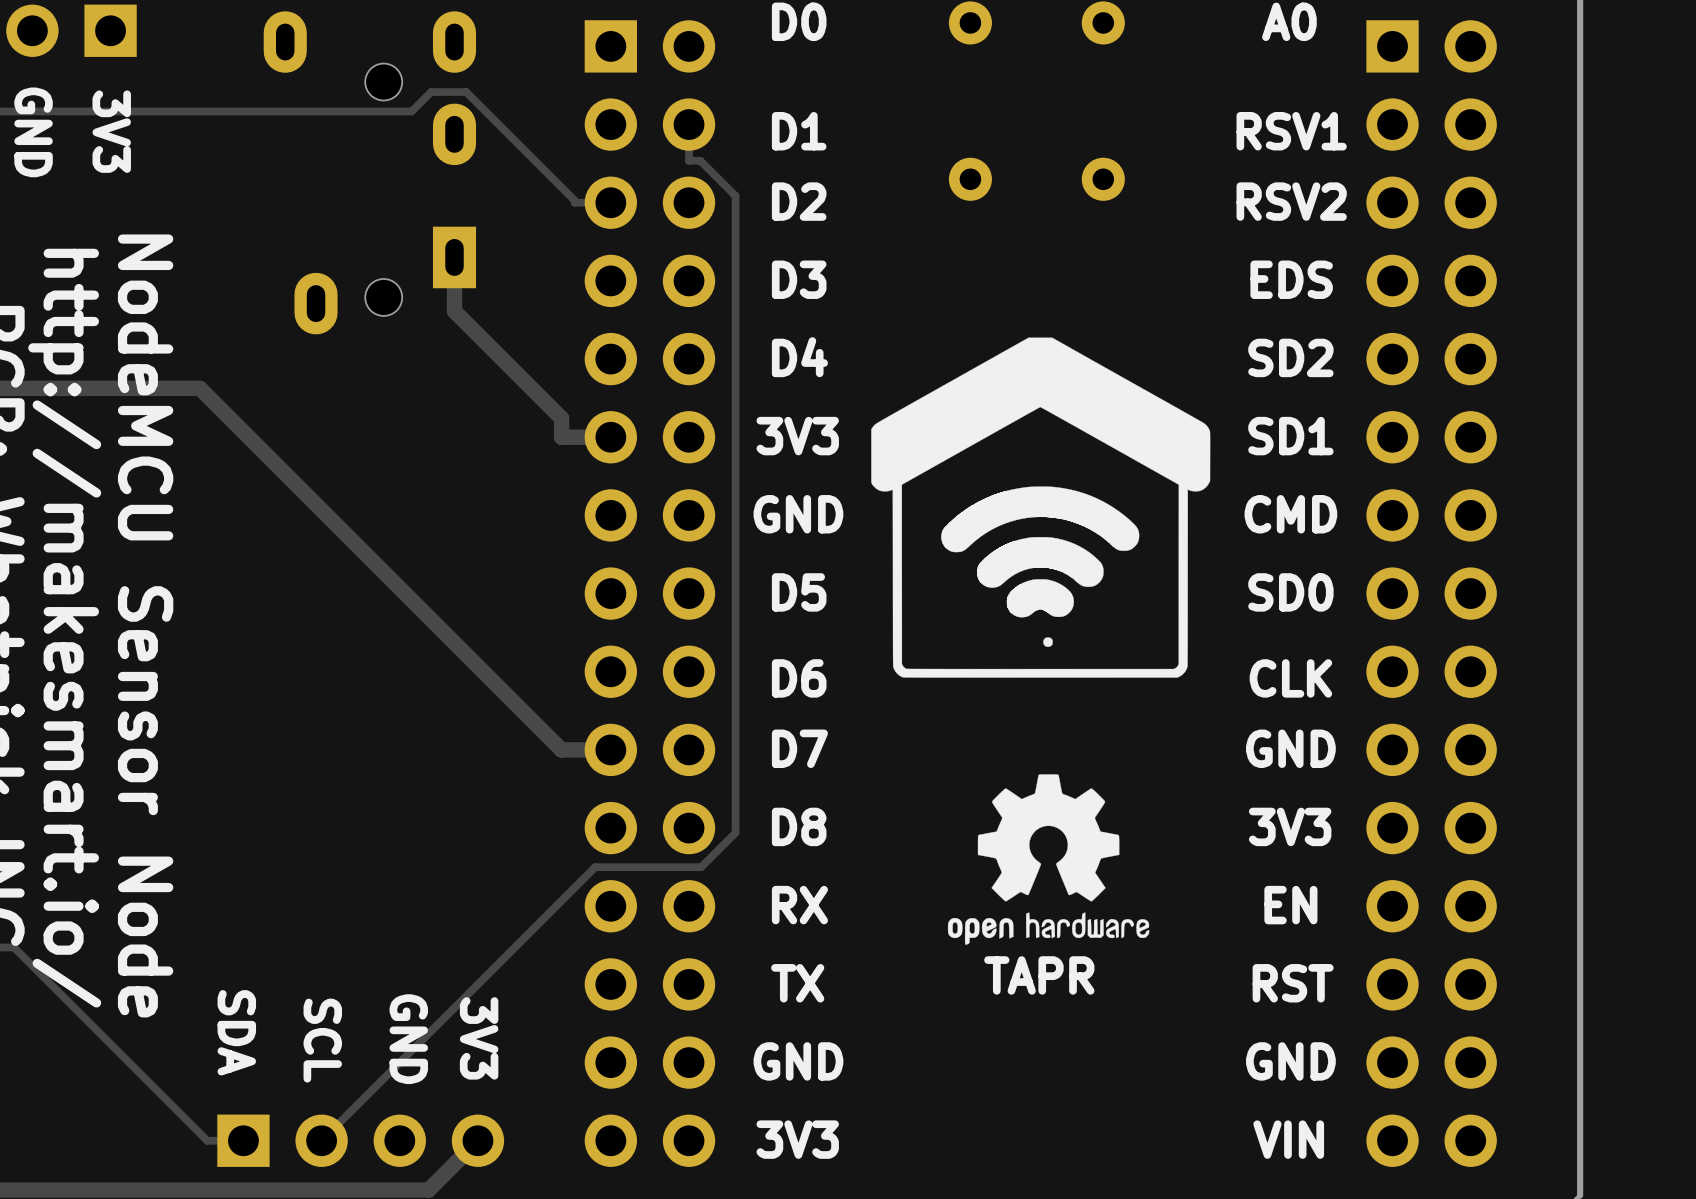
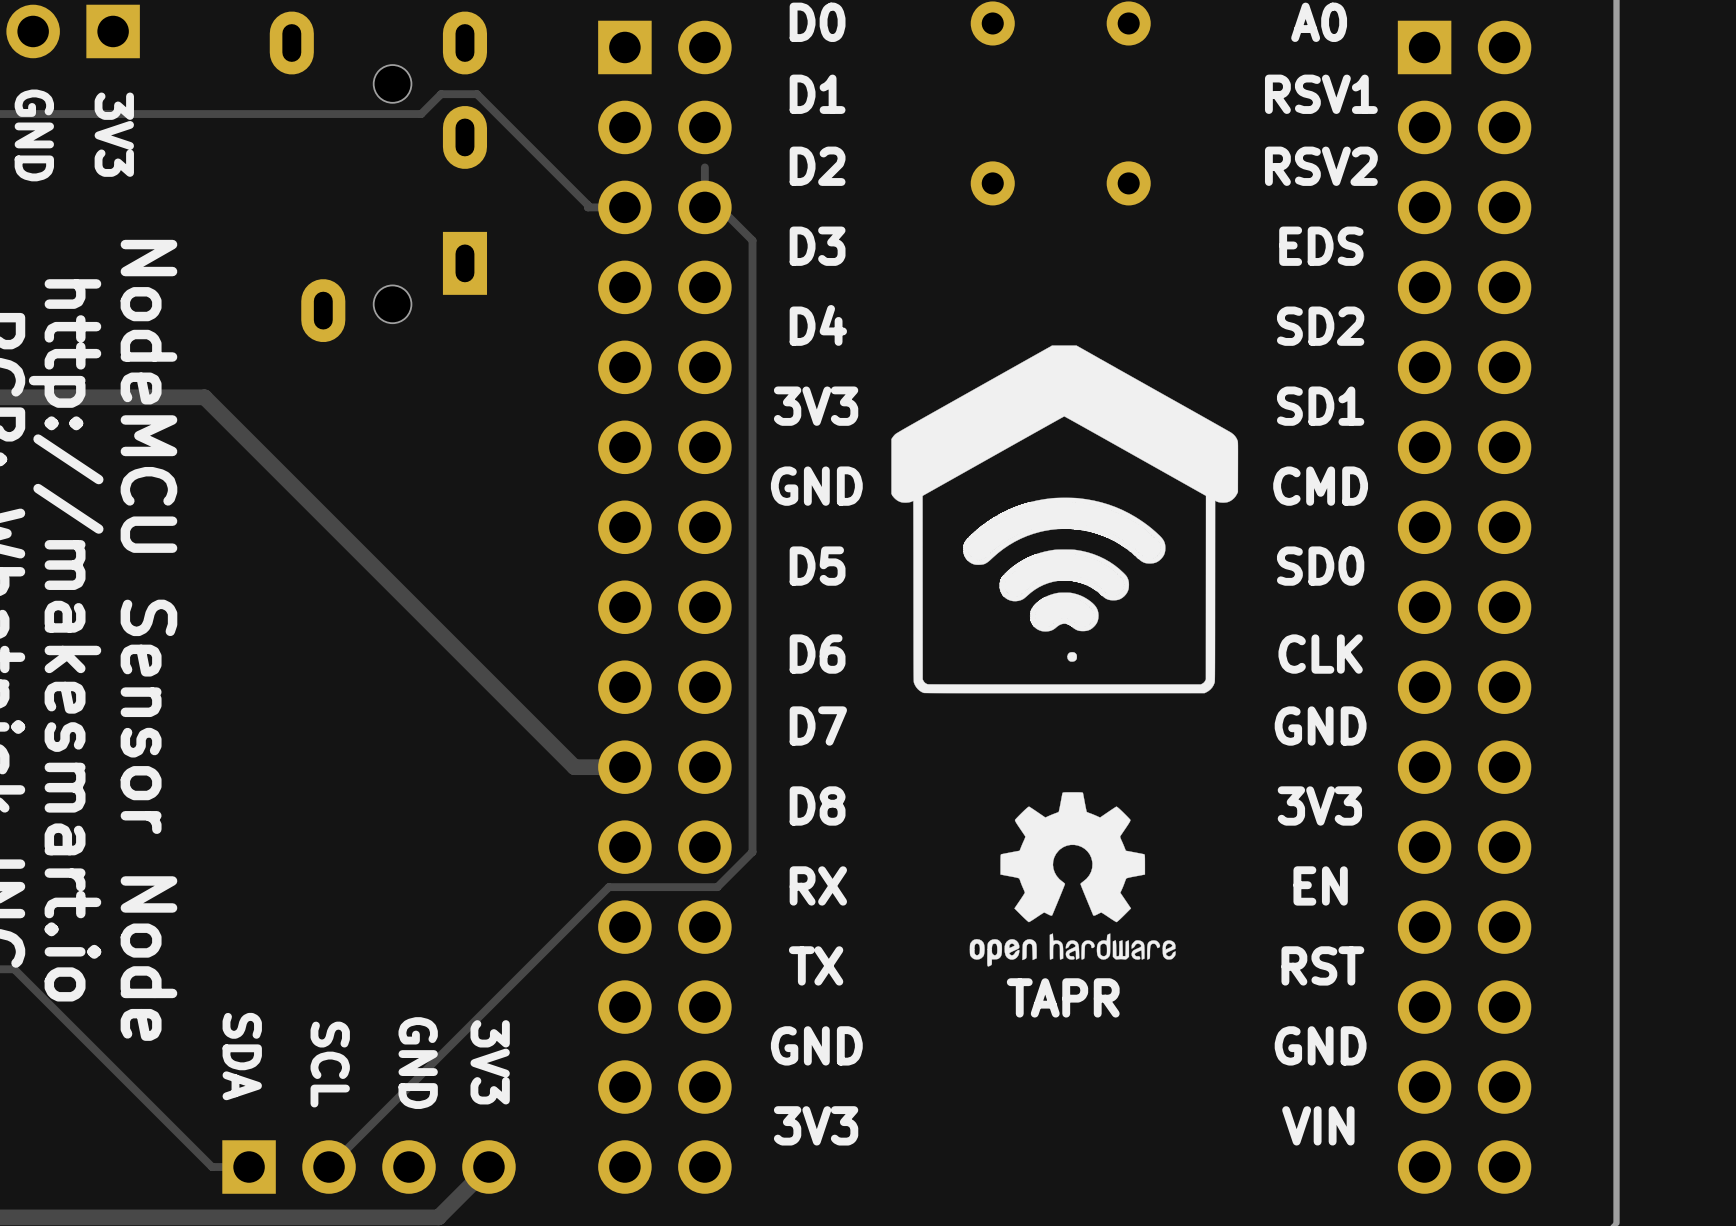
track: (689, 124) (689, 160) (700, 160) (735, 196) (735, 235) -> (704, 167) (704, 204) (716, 204) (752, 240)
text position: D1 (799, 131) -> D1 (817, 94)
text position: RSV1 (1291, 131) -> RSV1 (1321, 94)
text position: D2 (799, 201) -> D2 (817, 166)
text position: RSV2 (1291, 201) -> RSV2 (1321, 166)
track: (454, 257) (454, 311) (561, 418) (561, 437) (610, 437) -> none
text position: D3 (799, 279) -> D3 (817, 246)
text position: EDS (1291, 279) -> EDS (1321, 246)
text position: D4 (799, 357) -> D4 (818, 325)
text position: SD2 (1290, 357) -> SD2 (1320, 326)
text position: 3V3 (797, 436) -> 3V3 (816, 406)
text position: SD1 (1290, 436) -> SD1 (1320, 406)
text position: GND (798, 514) -> GND (816, 486)
text position: CMD (1290, 514) -> CMD (1320, 486)
text position: D5 (799, 592) -> D5 (817, 566)
text position: SD0 (1290, 592) -> SD0 (1320, 566)
text: http://makesmart.io/ (64, 628) -> http://makesmart.io (66, 640)
text position: D6 (799, 678) -> D6 (817, 654)
text position: CLK (1290, 678) -> CLK (1320, 654)
text position: D7 (799, 748) -> D7 (818, 726)
text position: GND (1290, 748) -> GND (1320, 726)
text position: D8 (799, 826) -> D8 (817, 805)
text position: 3V3 (1290, 826) -> 3V3 (1319, 805)
text position: RX (799, 905) -> RX (818, 885)
text position: EN (1290, 905) -> EN (1320, 885)
text position: TX (797, 983) -> TX (816, 965)
text position: RST (1293, 983) -> RST (1322, 965)
text position: GND (798, 1061) -> GND (816, 1045)
text position: GND (1290, 1061) -> GND (1320, 1045)
text position: 3V3 (797, 1139) -> 3V3 (816, 1125)
text position: VIN (1288, 1139) -> VIN (1318, 1125)

